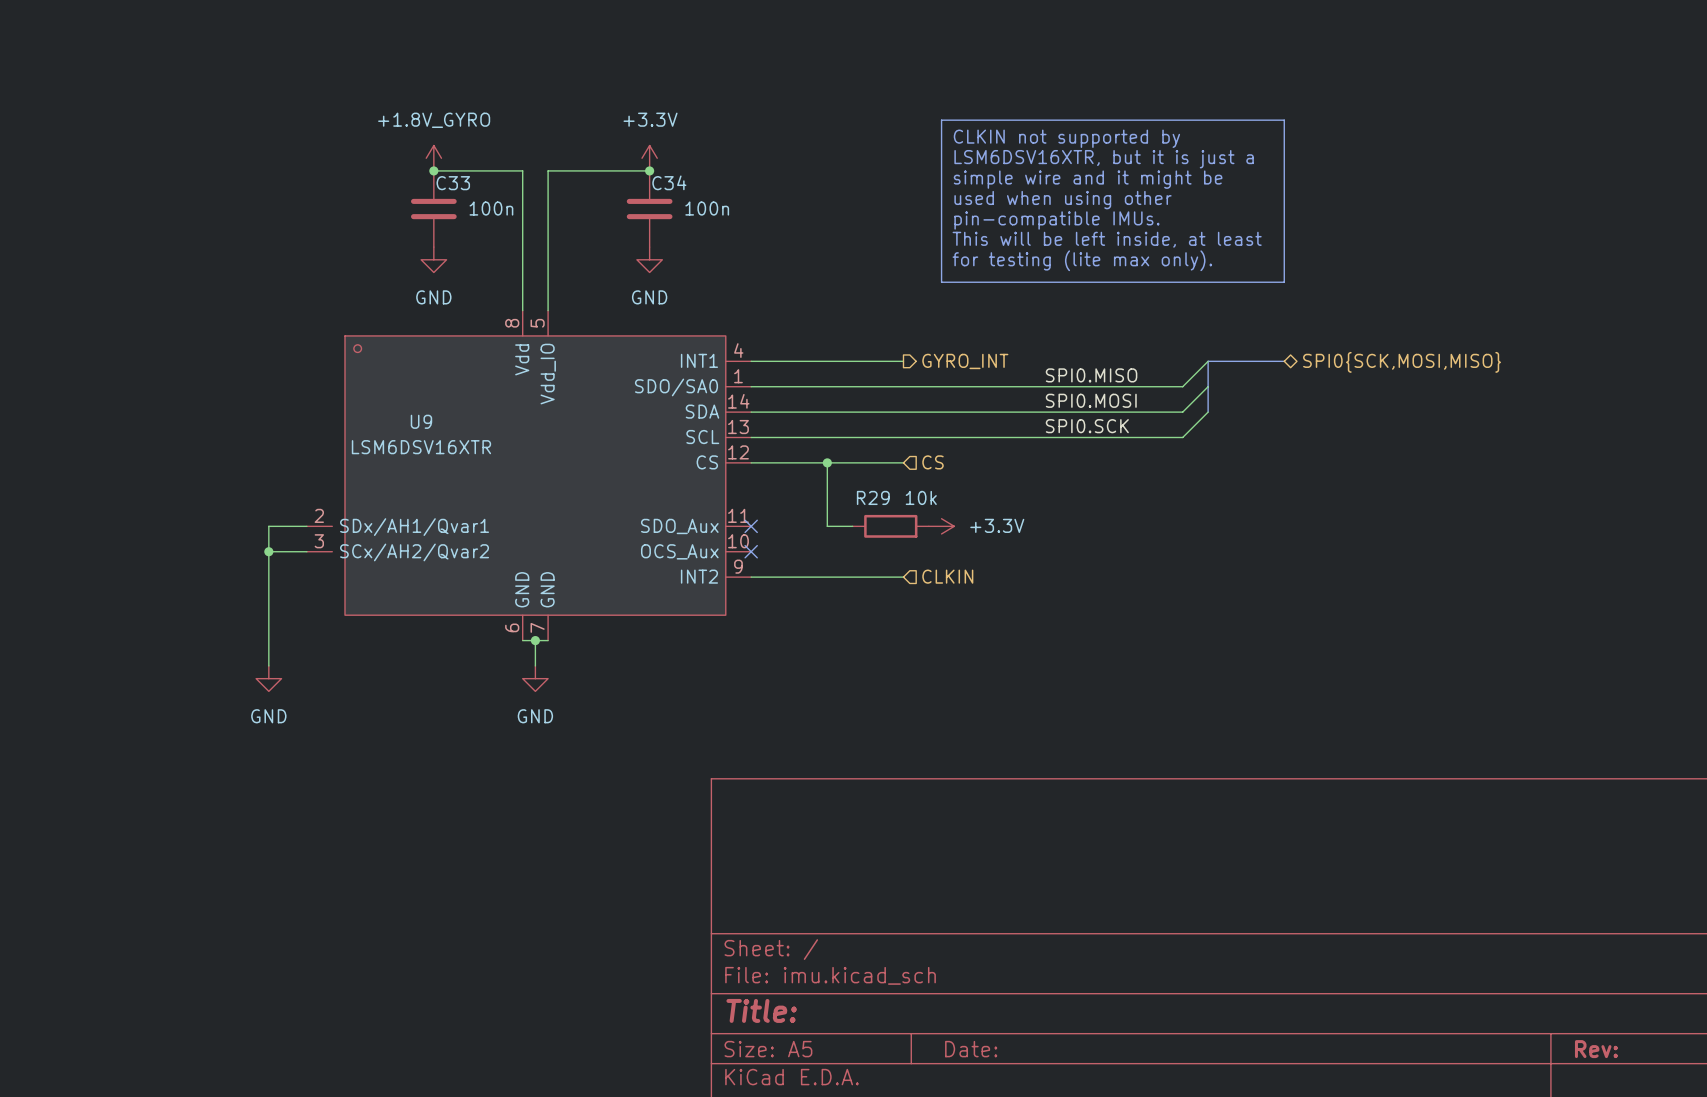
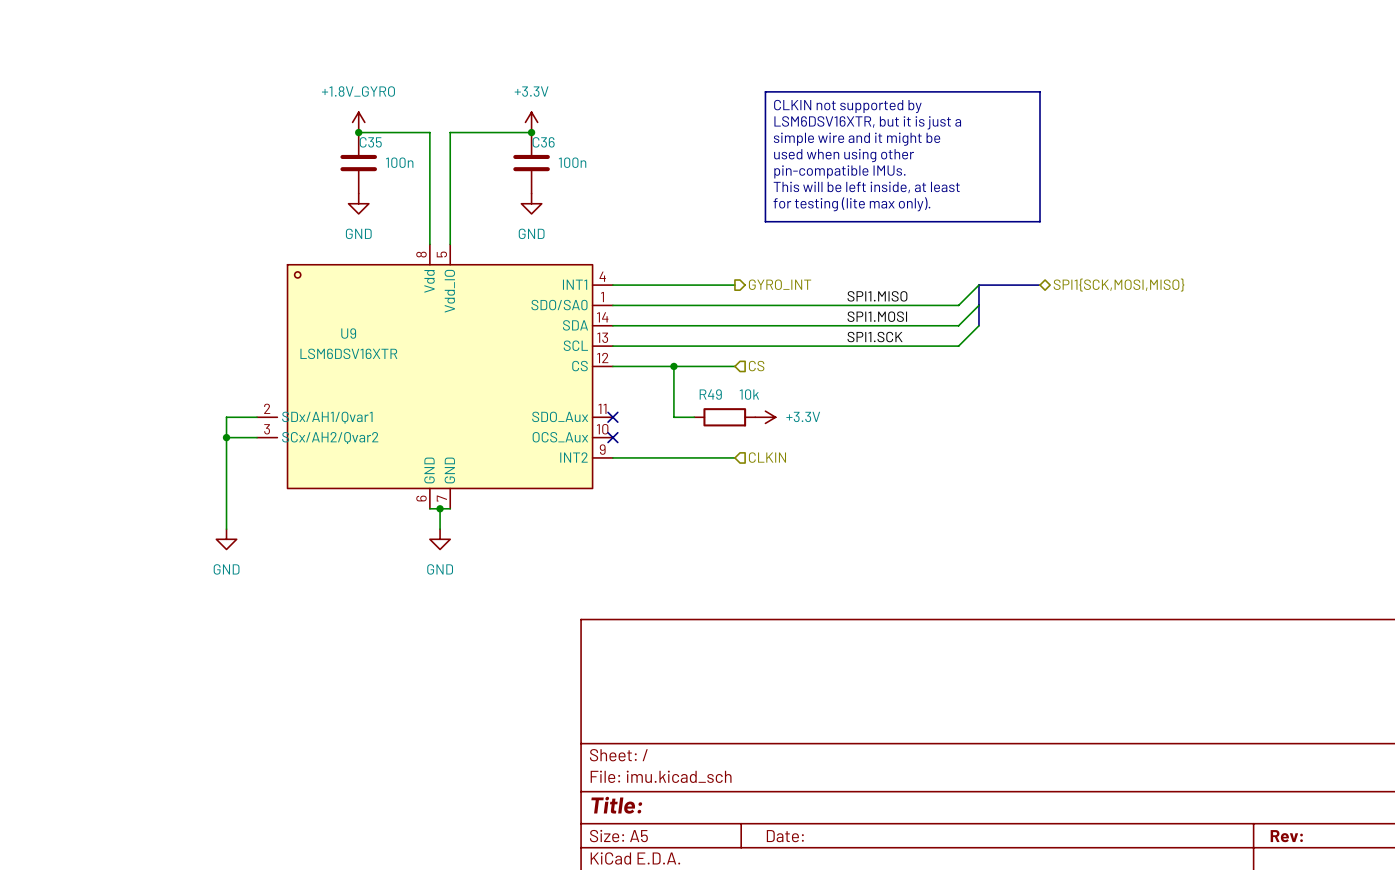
C34 name: C34 (669, 182) -> C36 (543, 142)
C33 name: C33 (453, 183) -> C35 (370, 142)
hierarchical label: SPI0{SCK,MOSI,MISO} (1402, 362) -> SPI1{SCK,MOSI,MISO} (1119, 285)
label: SPI0.MISO (1091, 375) -> SPI1.MISO (877, 296)
label: SPI0.MOSI (1091, 400) -> SPI1.MOSI (877, 316)
label: SPI0.SCK (1087, 426) -> SPI1.SCK (875, 337)
R29 name: R29 (873, 497) -> R49 (710, 394)

